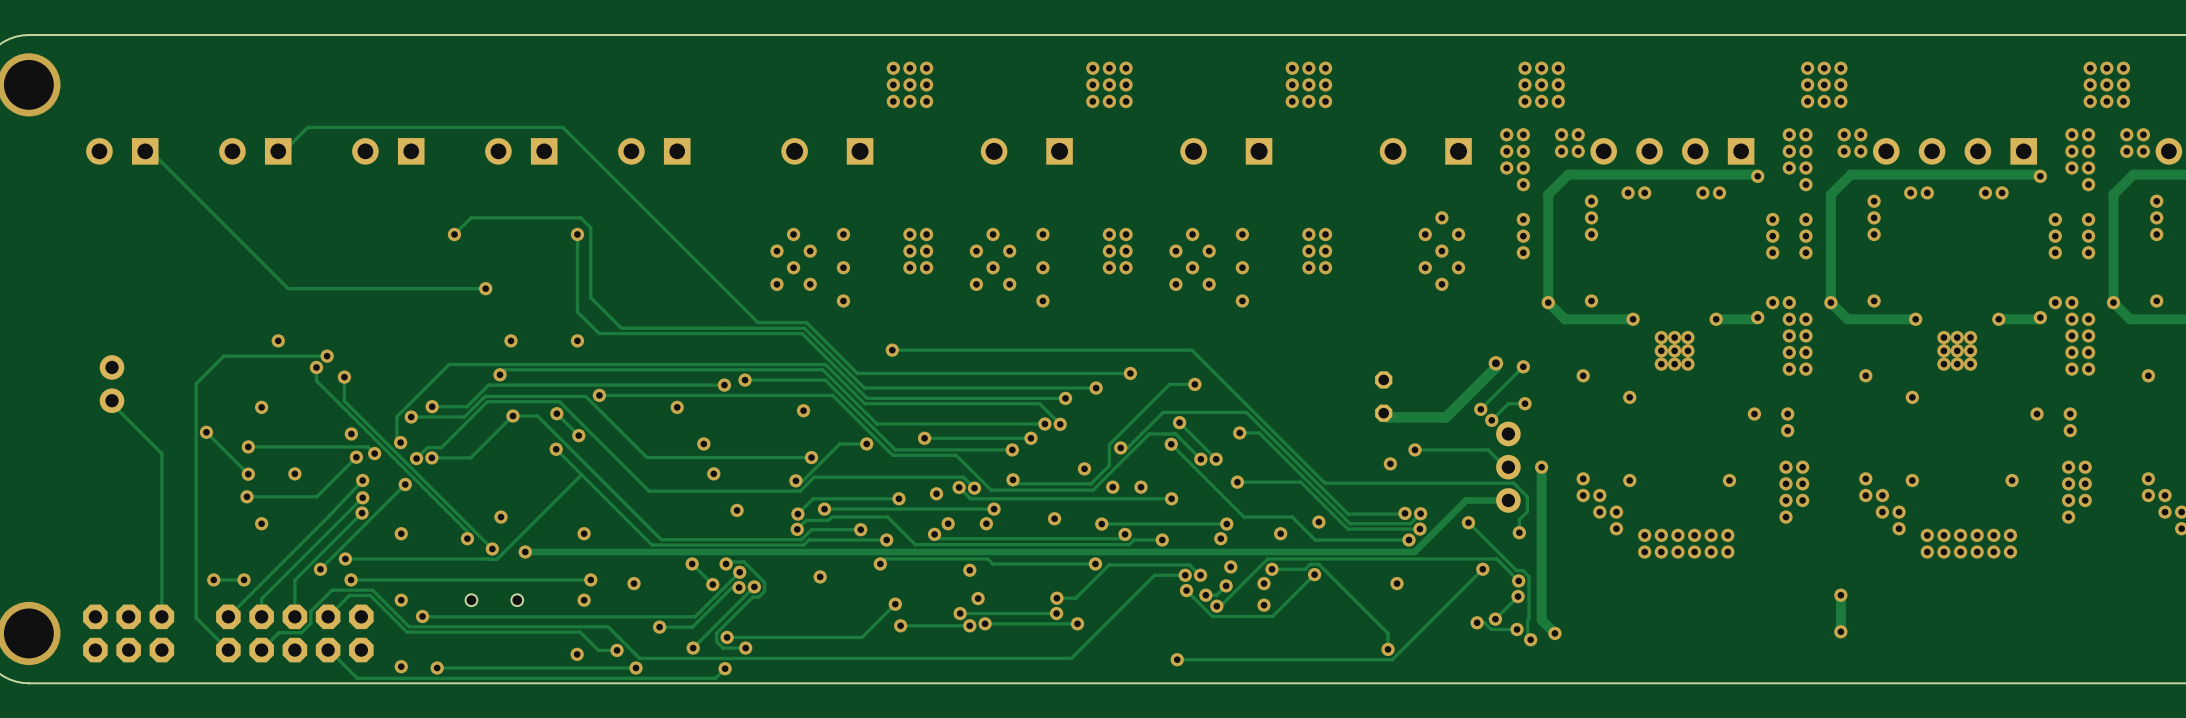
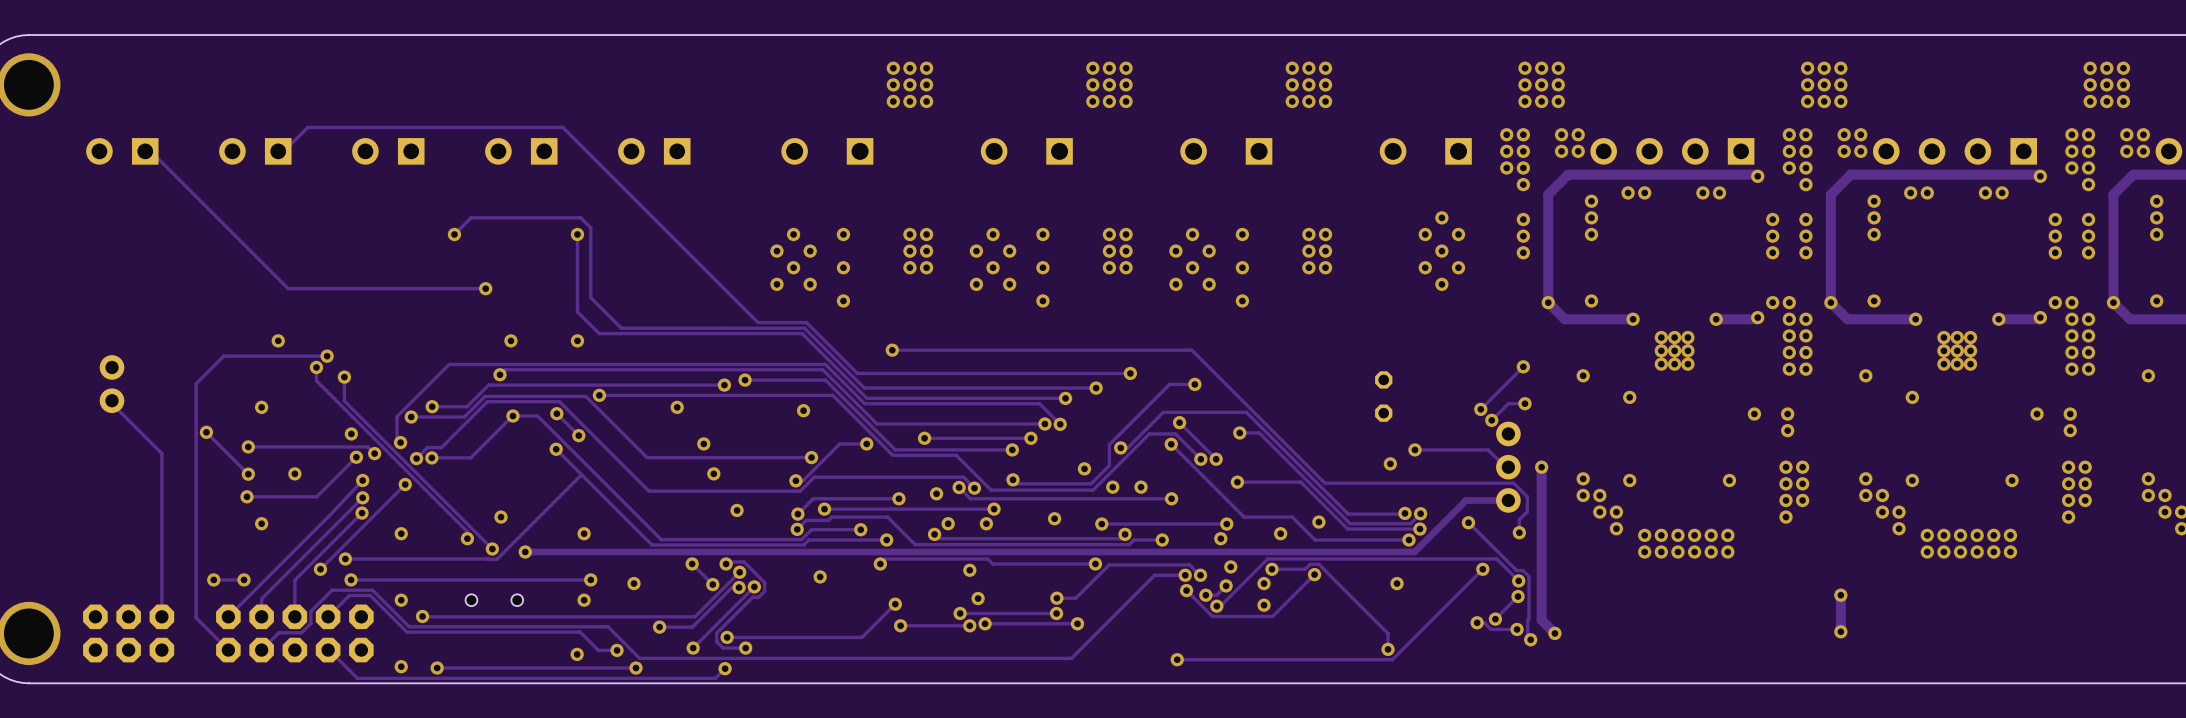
track: (1495, 363) (1495, 367) (1446, 417) (1387, 417) (1383, 413) -> none
via: (1495, 363) -> none

